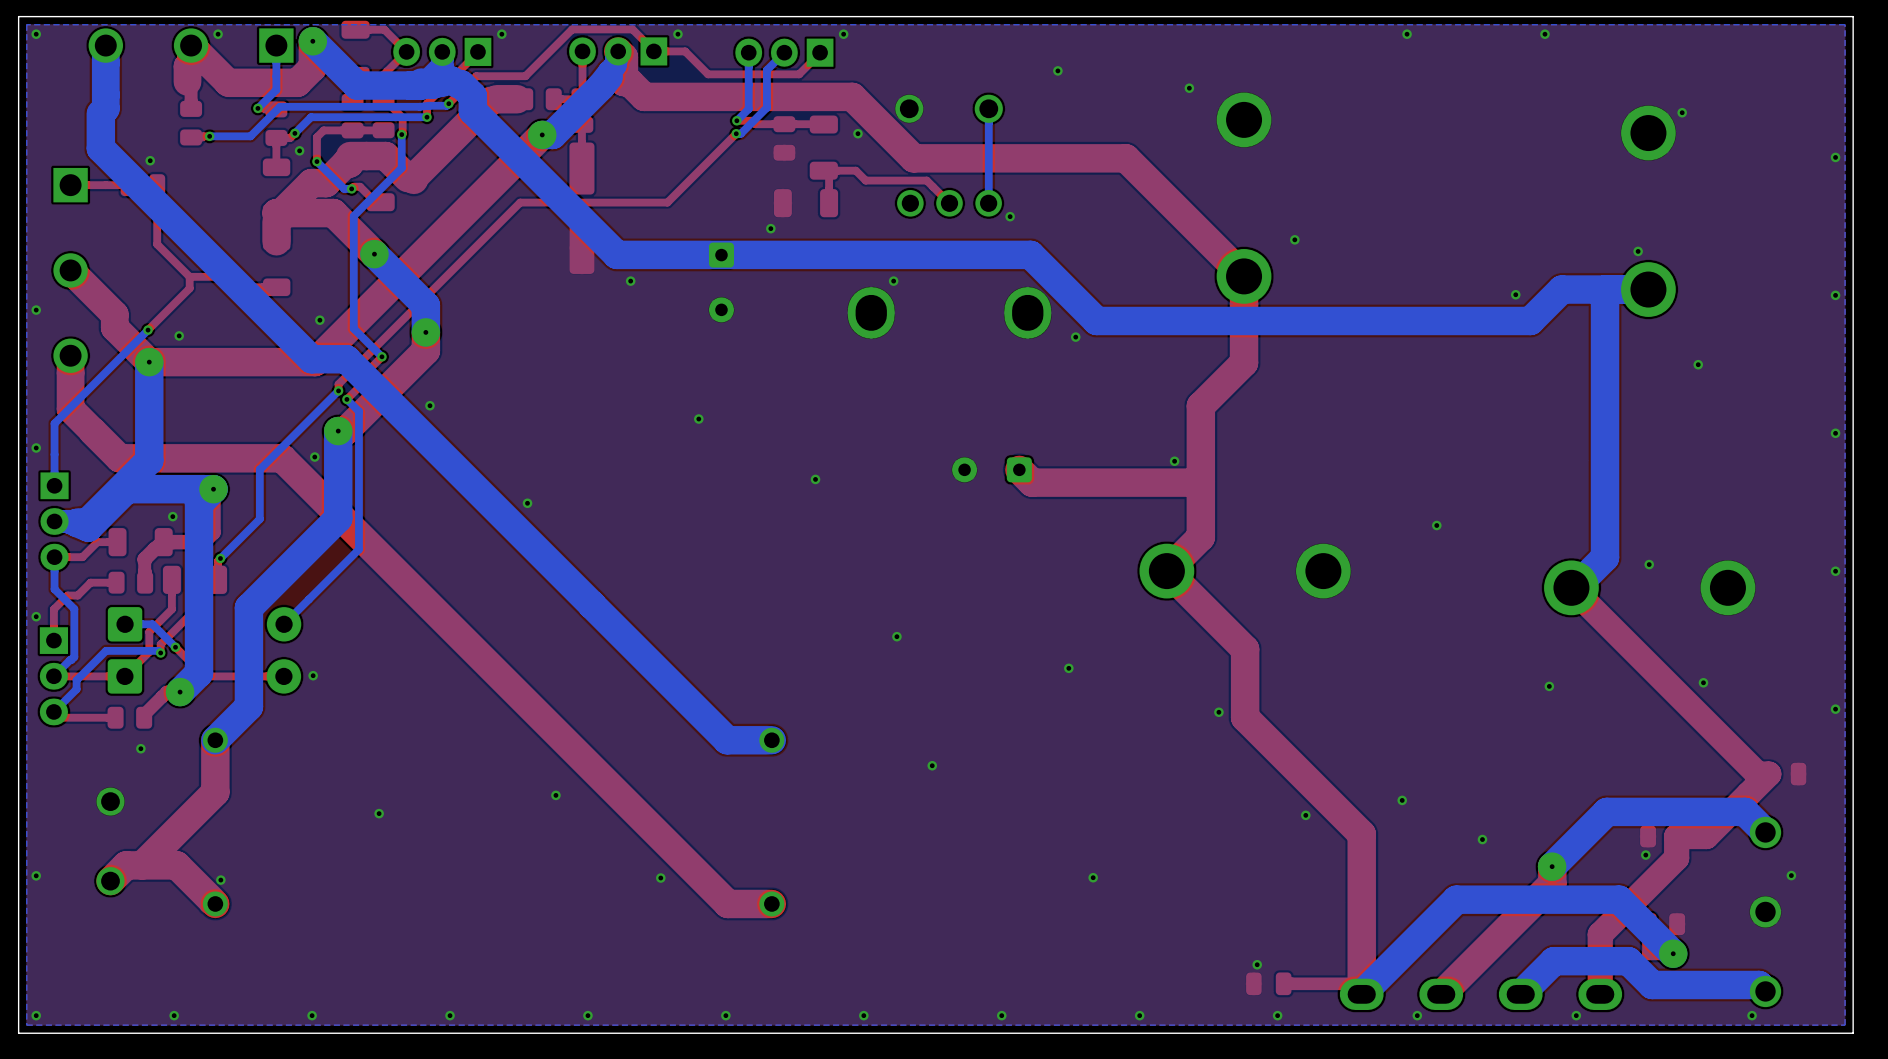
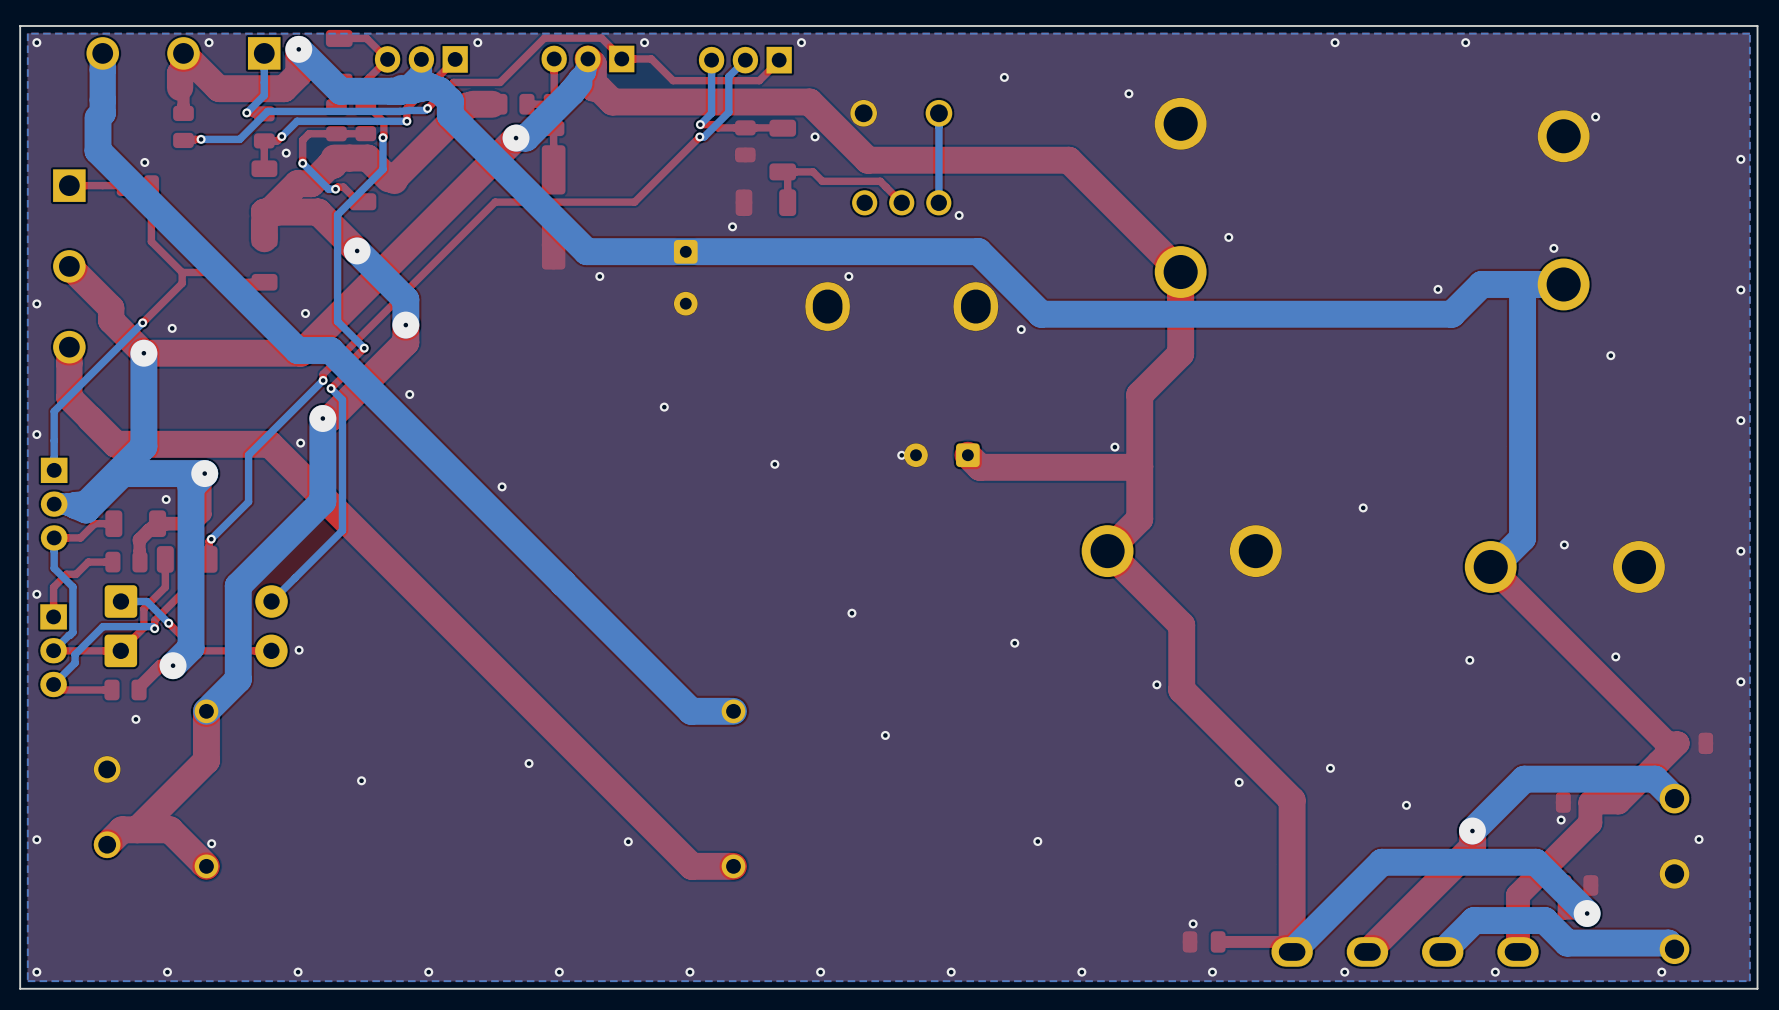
via: none -> (901, 455)

